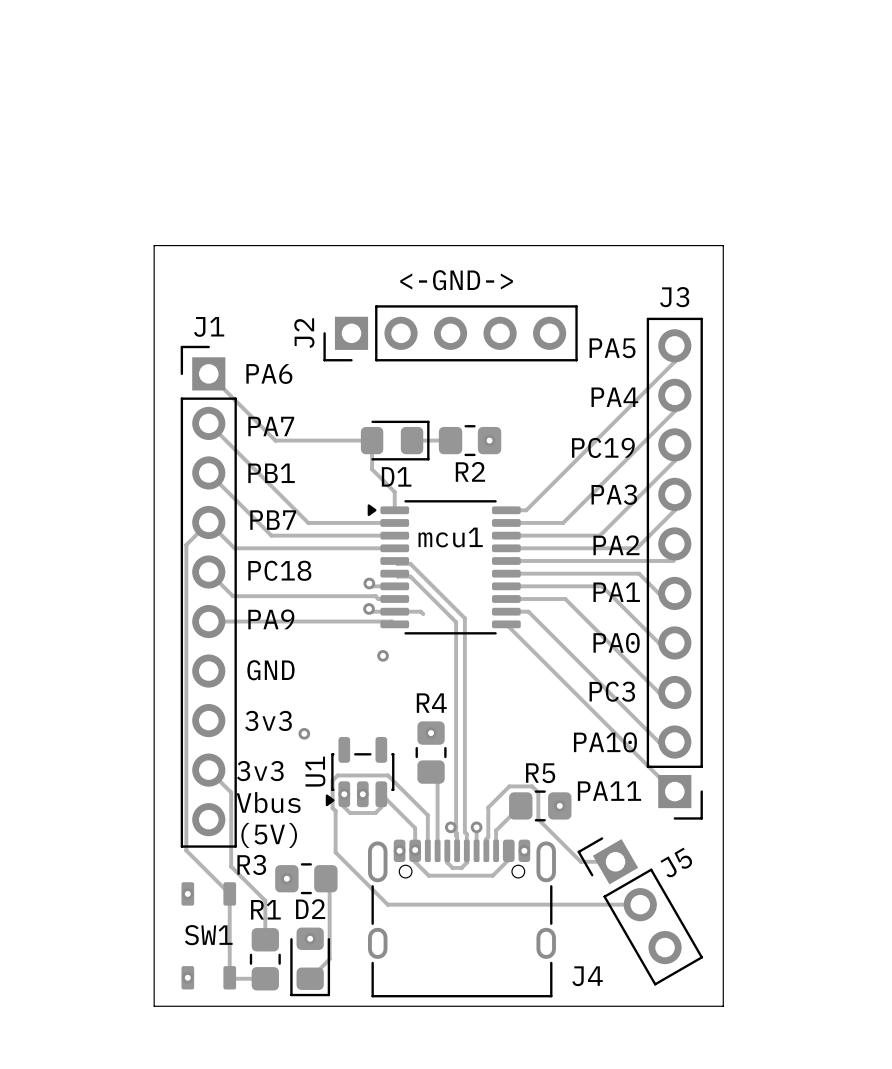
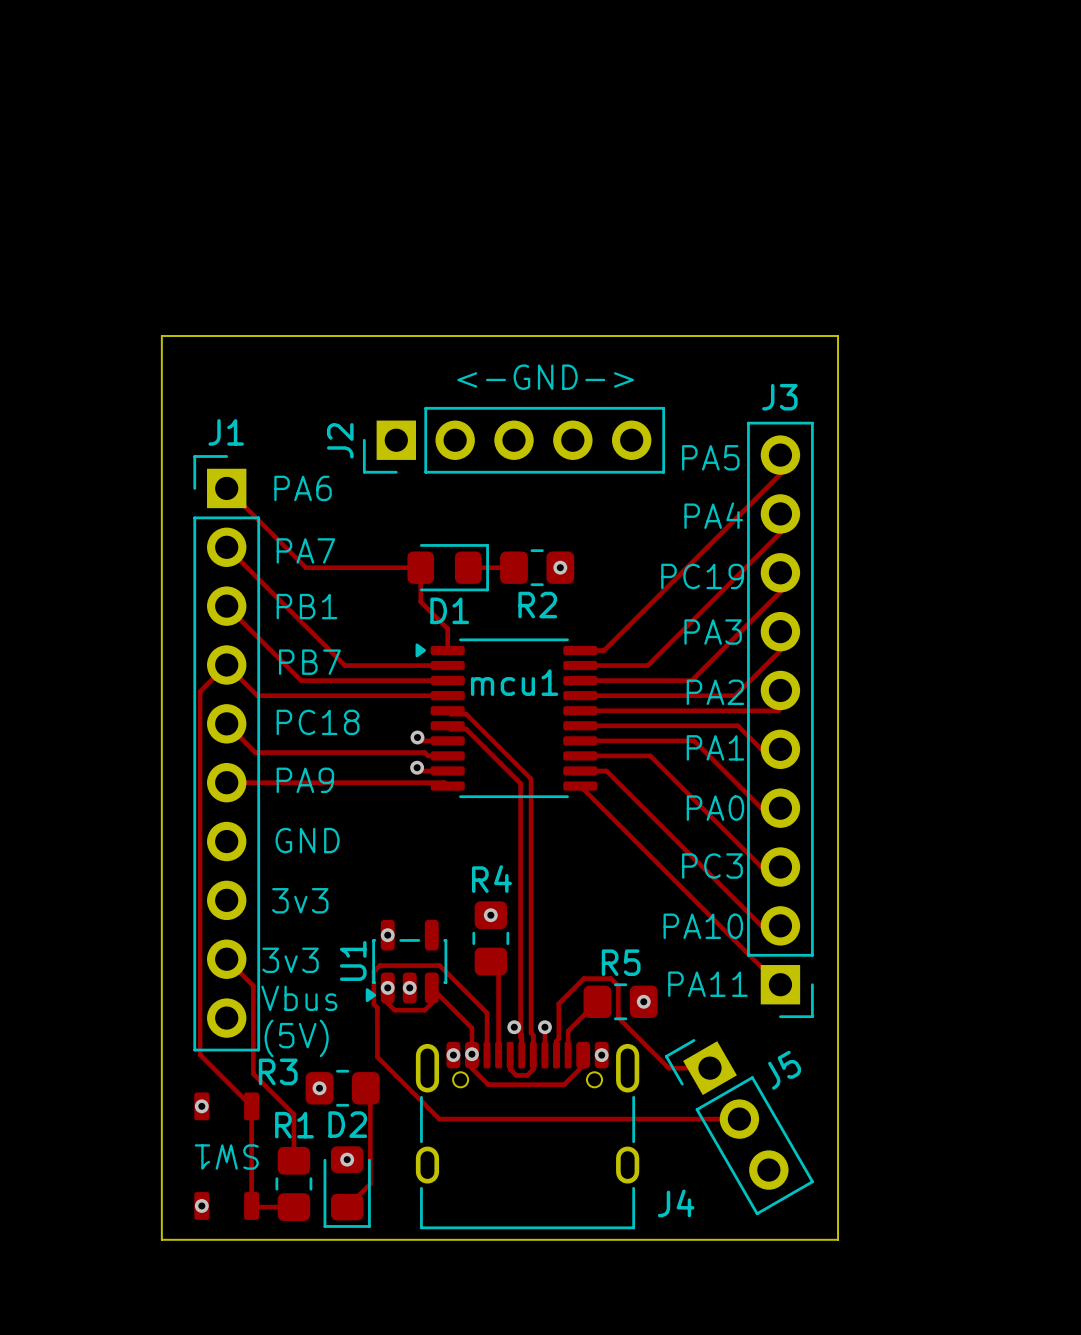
track: (394, 611) (420, 611) (423, 614) -> none
via: (383, 655) -> none
via position: (304, 733) -> (387, 935)
SW1 name rotation: 0° (208, 935) -> 180° (226, 1157)

